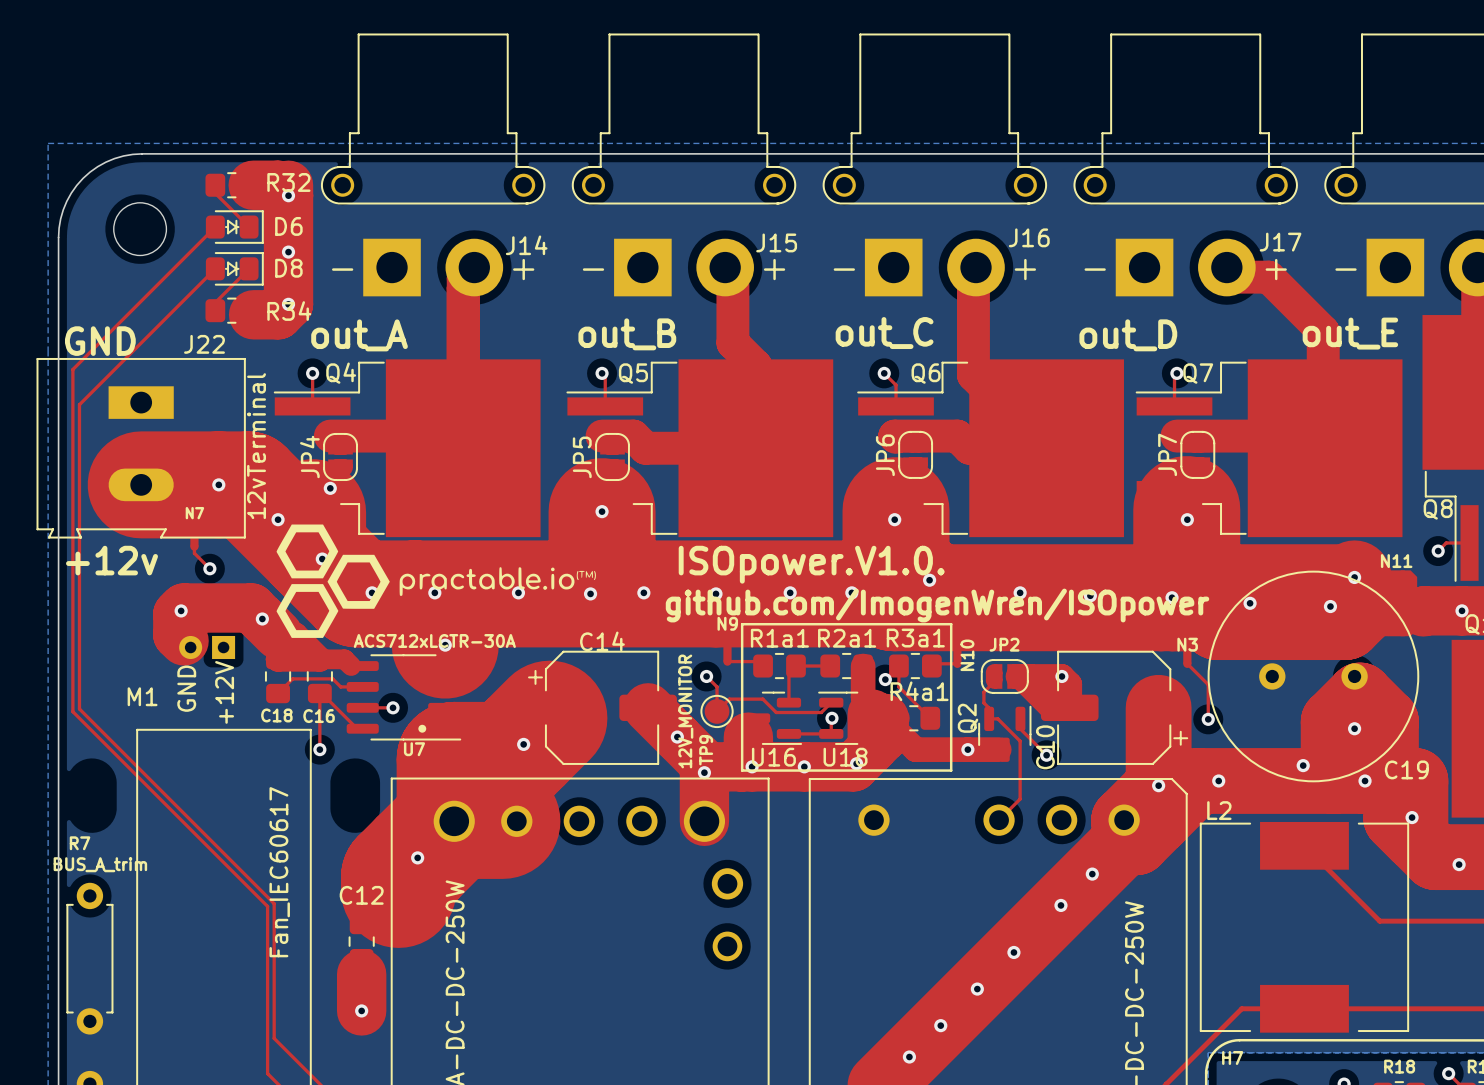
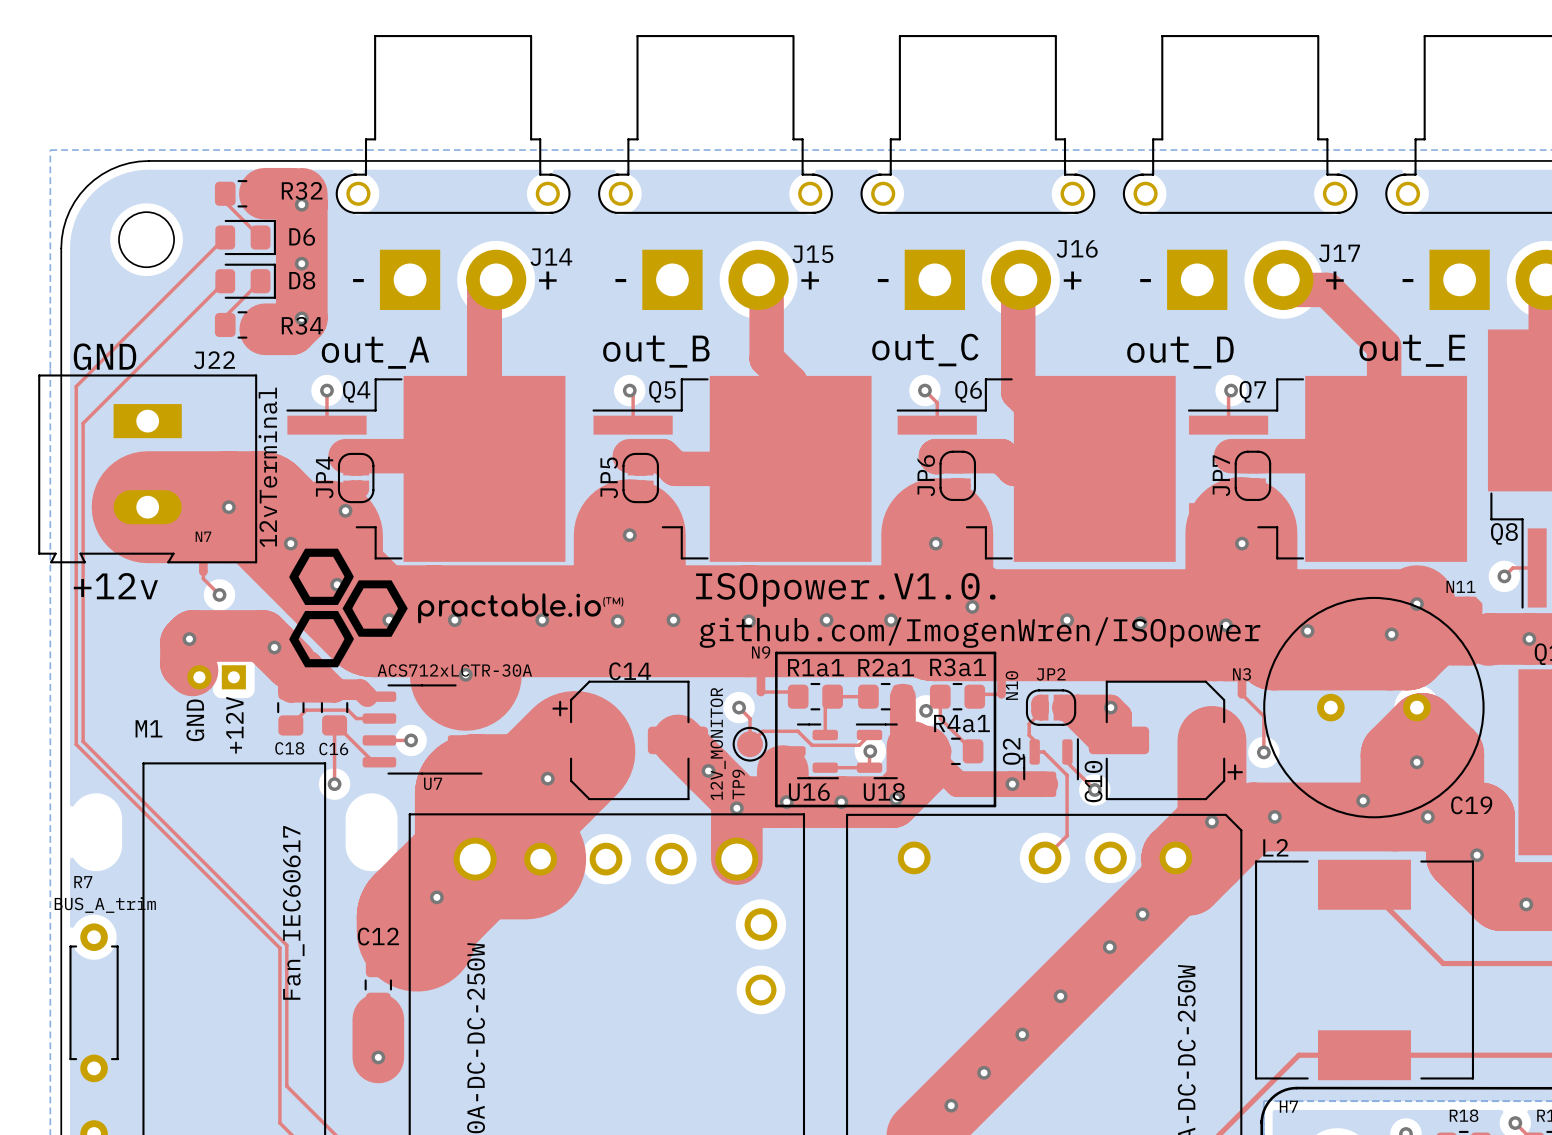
D6 footprint: [205, 210, 264, 244] -> [215, 219, 276, 256]
D8 footprint: [205, 252, 264, 286] -> [215, 263, 276, 299]
U7 footprint: [346, 654, 462, 741] -> [362, 684, 483, 775]

